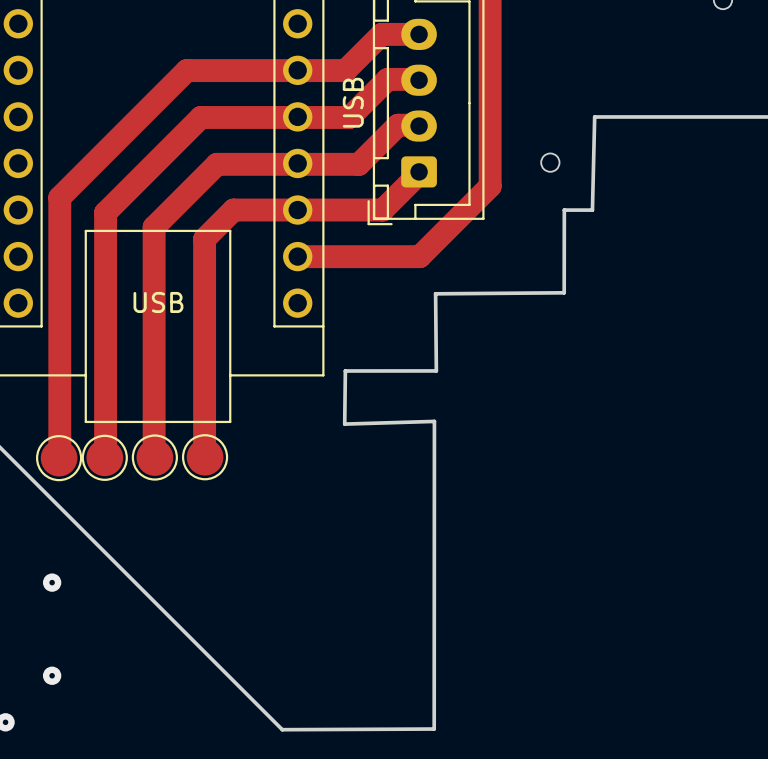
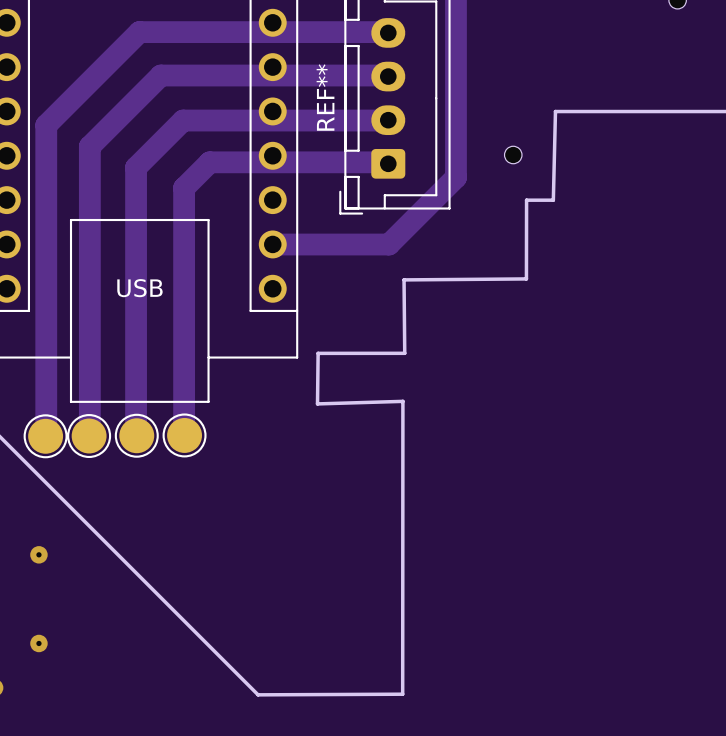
track: (419, 34) (381, 34) (345, 70) (186, 70) (59, 197) -> (388, 32) (139, 32) (46, 125) (46, 188)
track: (421, 79) (387, 79) (349, 117) (200, 117) (105, 212) -> (390, 75) (160, 75) (89, 146) (89, 202)
USB name: USB (353, 102) -> REF** (325, 97)
track: (421, 125) (398, 125) (358, 164) (216, 164) (154, 227) -> (390, 119) (183, 120) (136, 167) (136, 216)
track: (421, 171) (382, 210) (233, 210) (204, 239) -> (390, 163) (209, 162) (184, 188) (184, 227)

